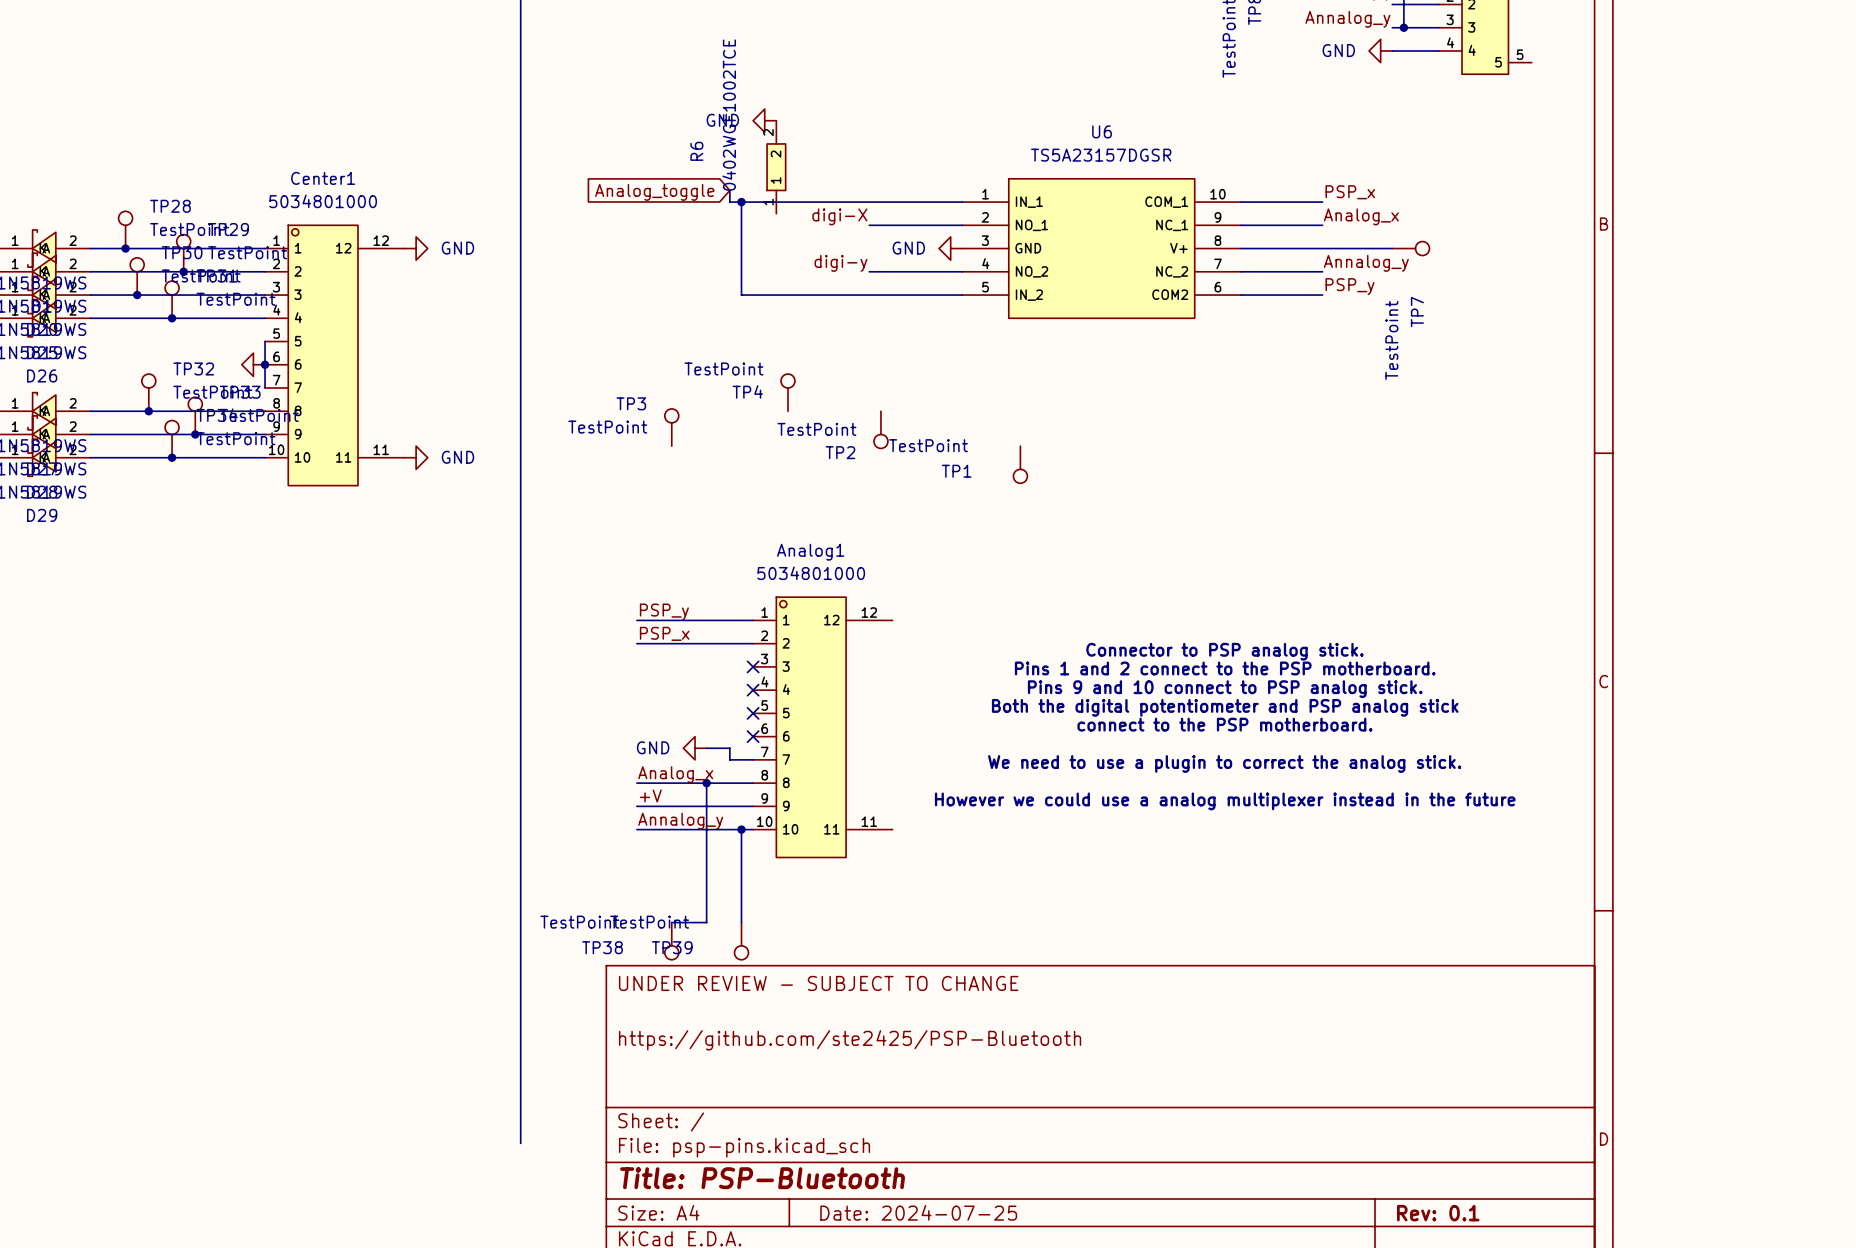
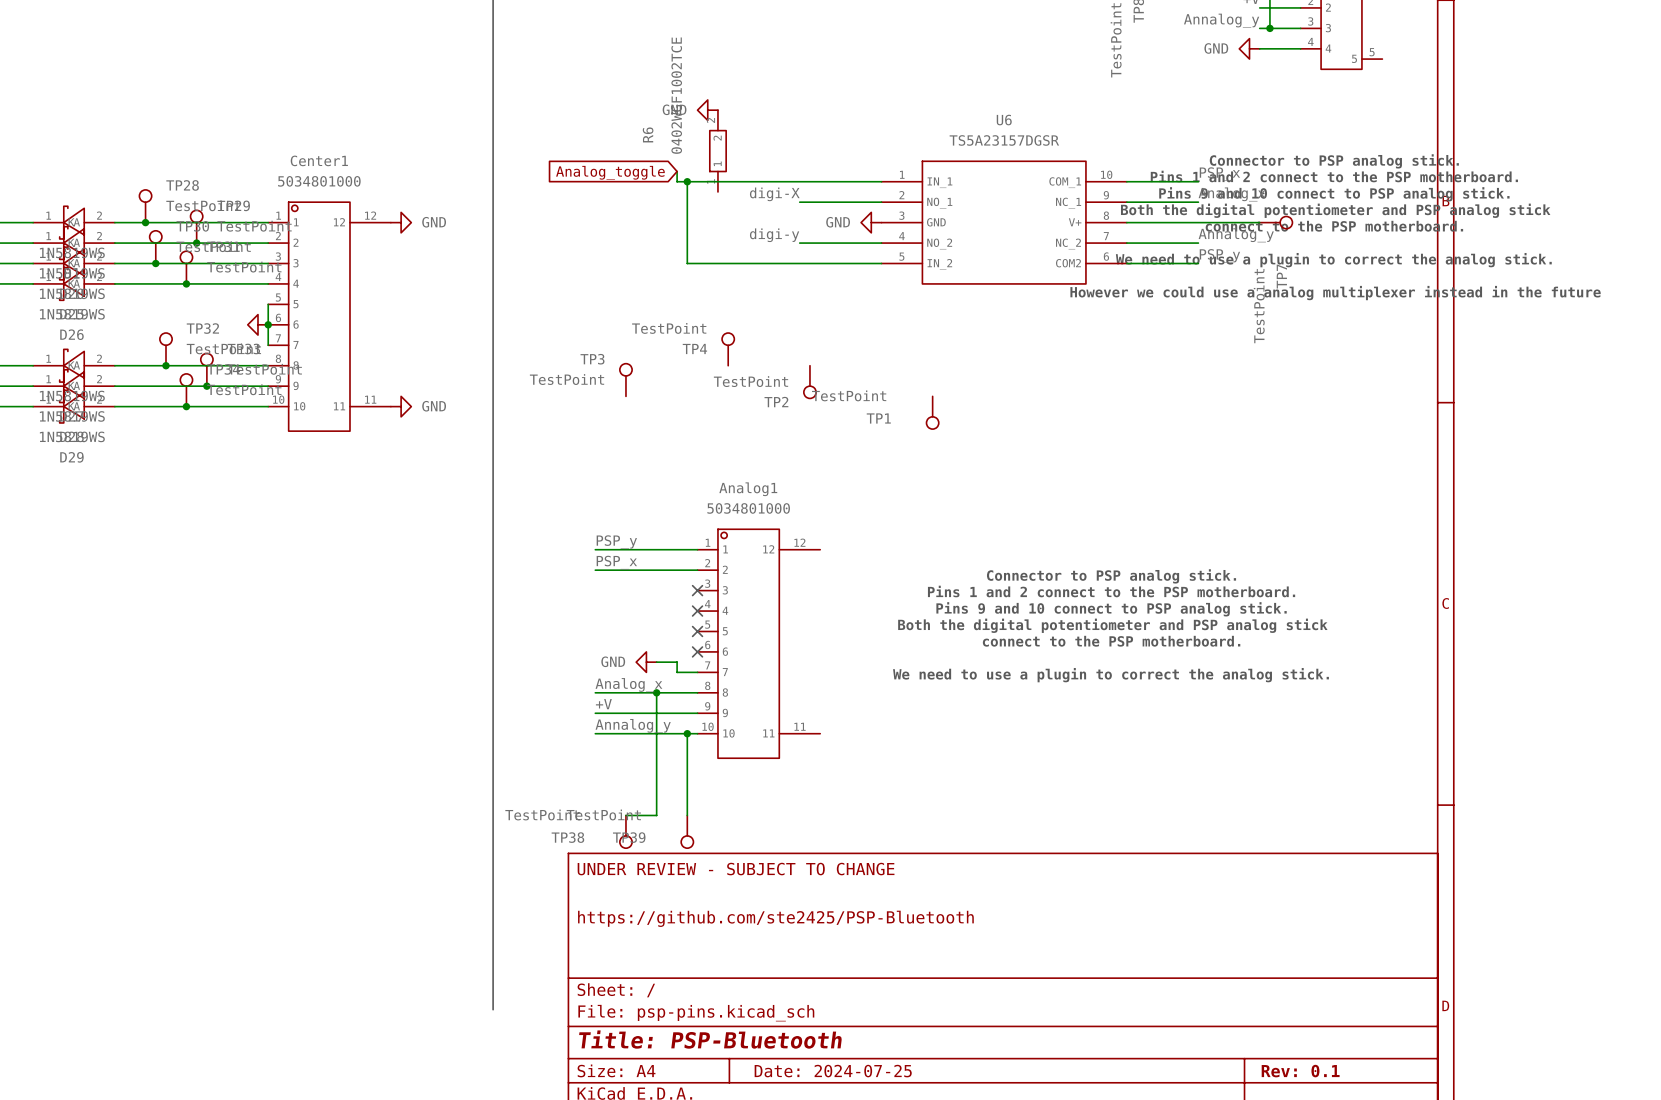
text: none -> Connector to PSP analog stick. (1334, 161)
text: none -> Pins 1 and 2 connect to the PSP motherboard. (1334, 176)
text: none -> Pins 9 and 10 connect to PSP analog stick. (1334, 194)
text: none -> Both the digital potentiometer and PSP analog stick (1335, 210)
text: none -> connect to the PSP motherboard. (1334, 226)
text: none -> We need to use a plugin to correct the analog stick. (1333, 260)
text: none -> However we could use a analog multiplexer instead in the future (1335, 293)
text: However we could use a analog multiplexer instead in the future (1225, 801) -> none

